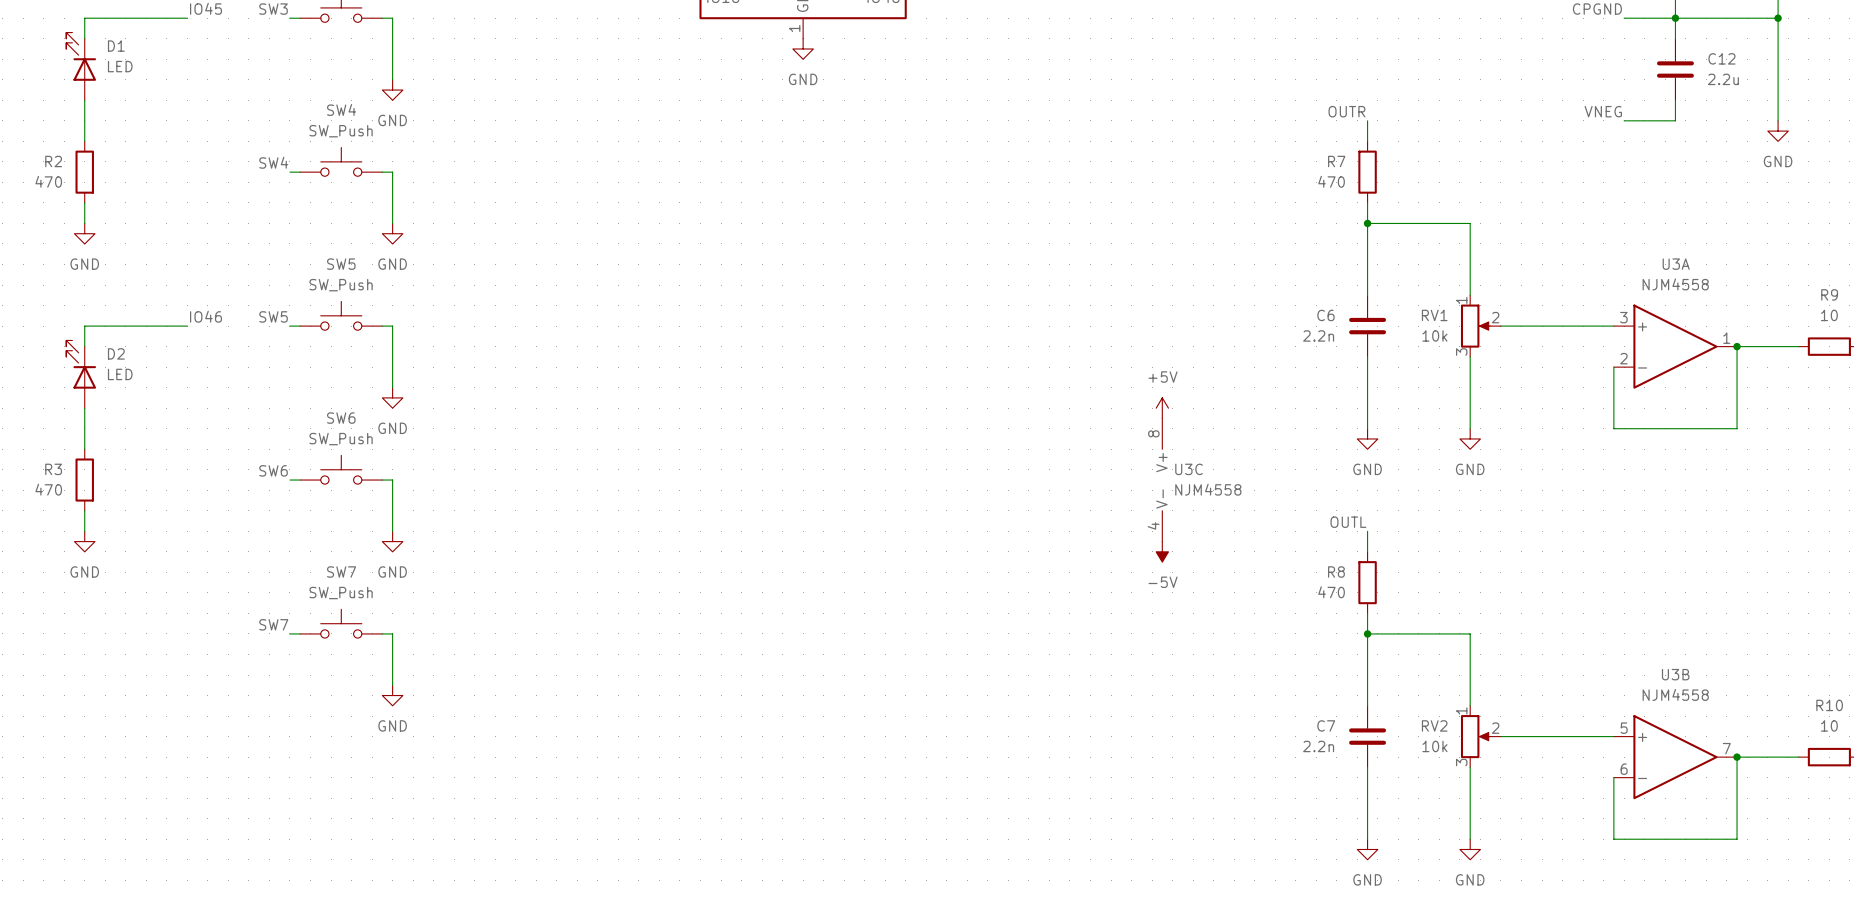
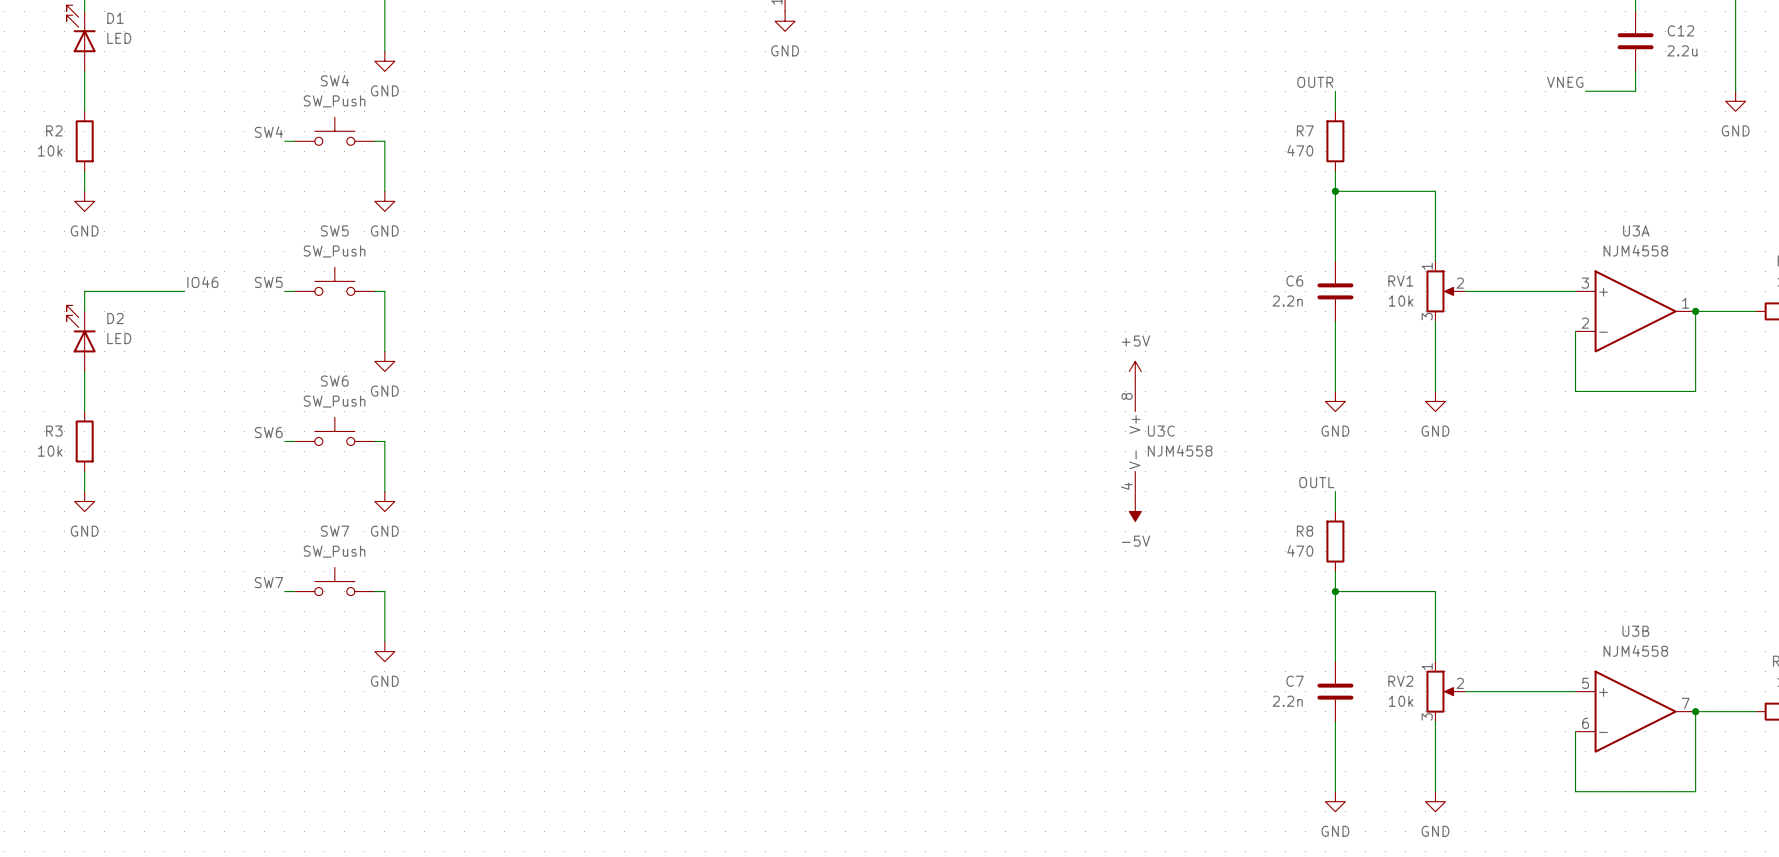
R2 value: 470 (48, 181) -> 10k (50, 150)
R3 value: 470 (48, 489) -> 10k (50, 451)

